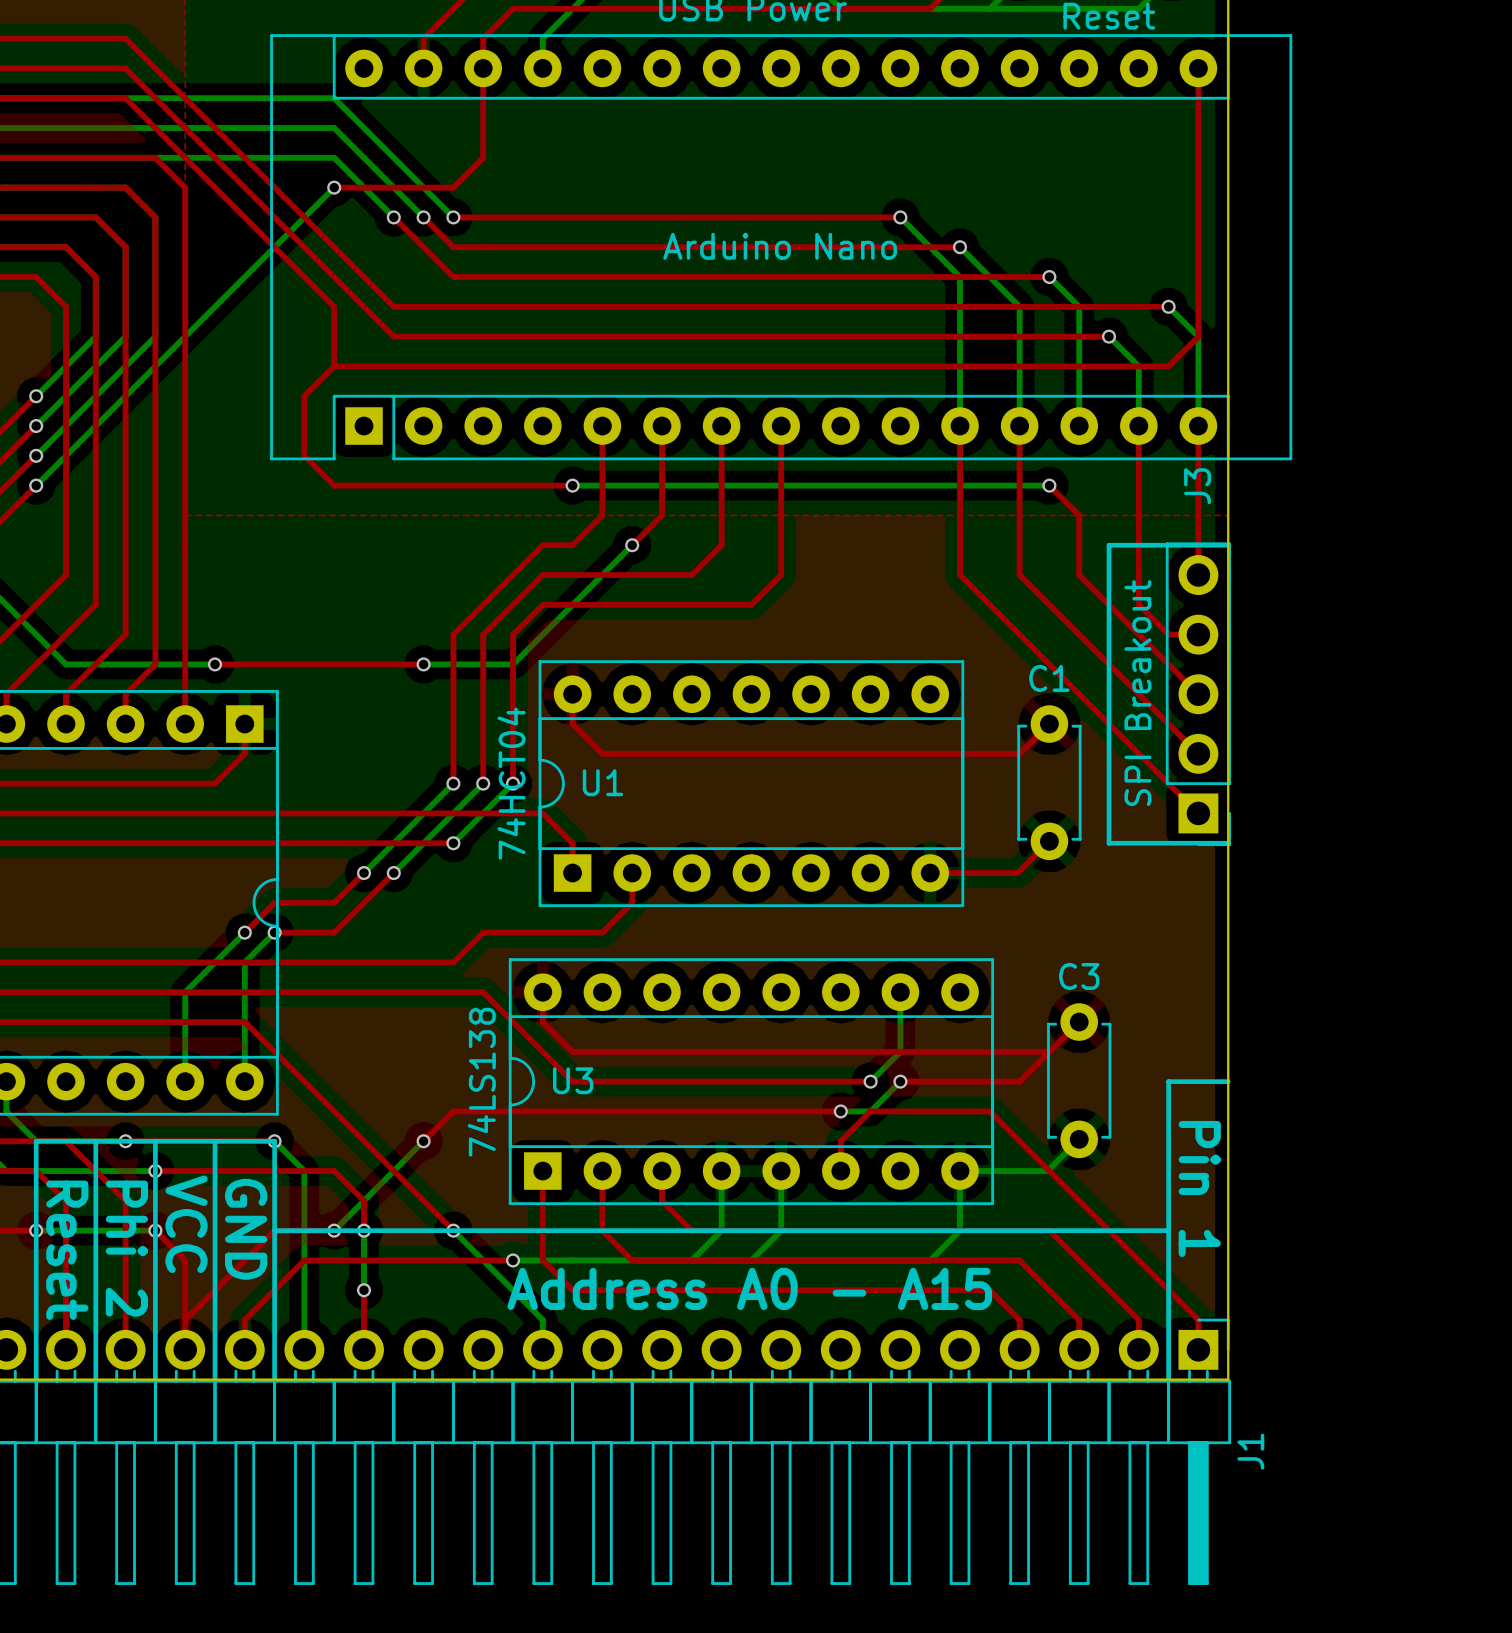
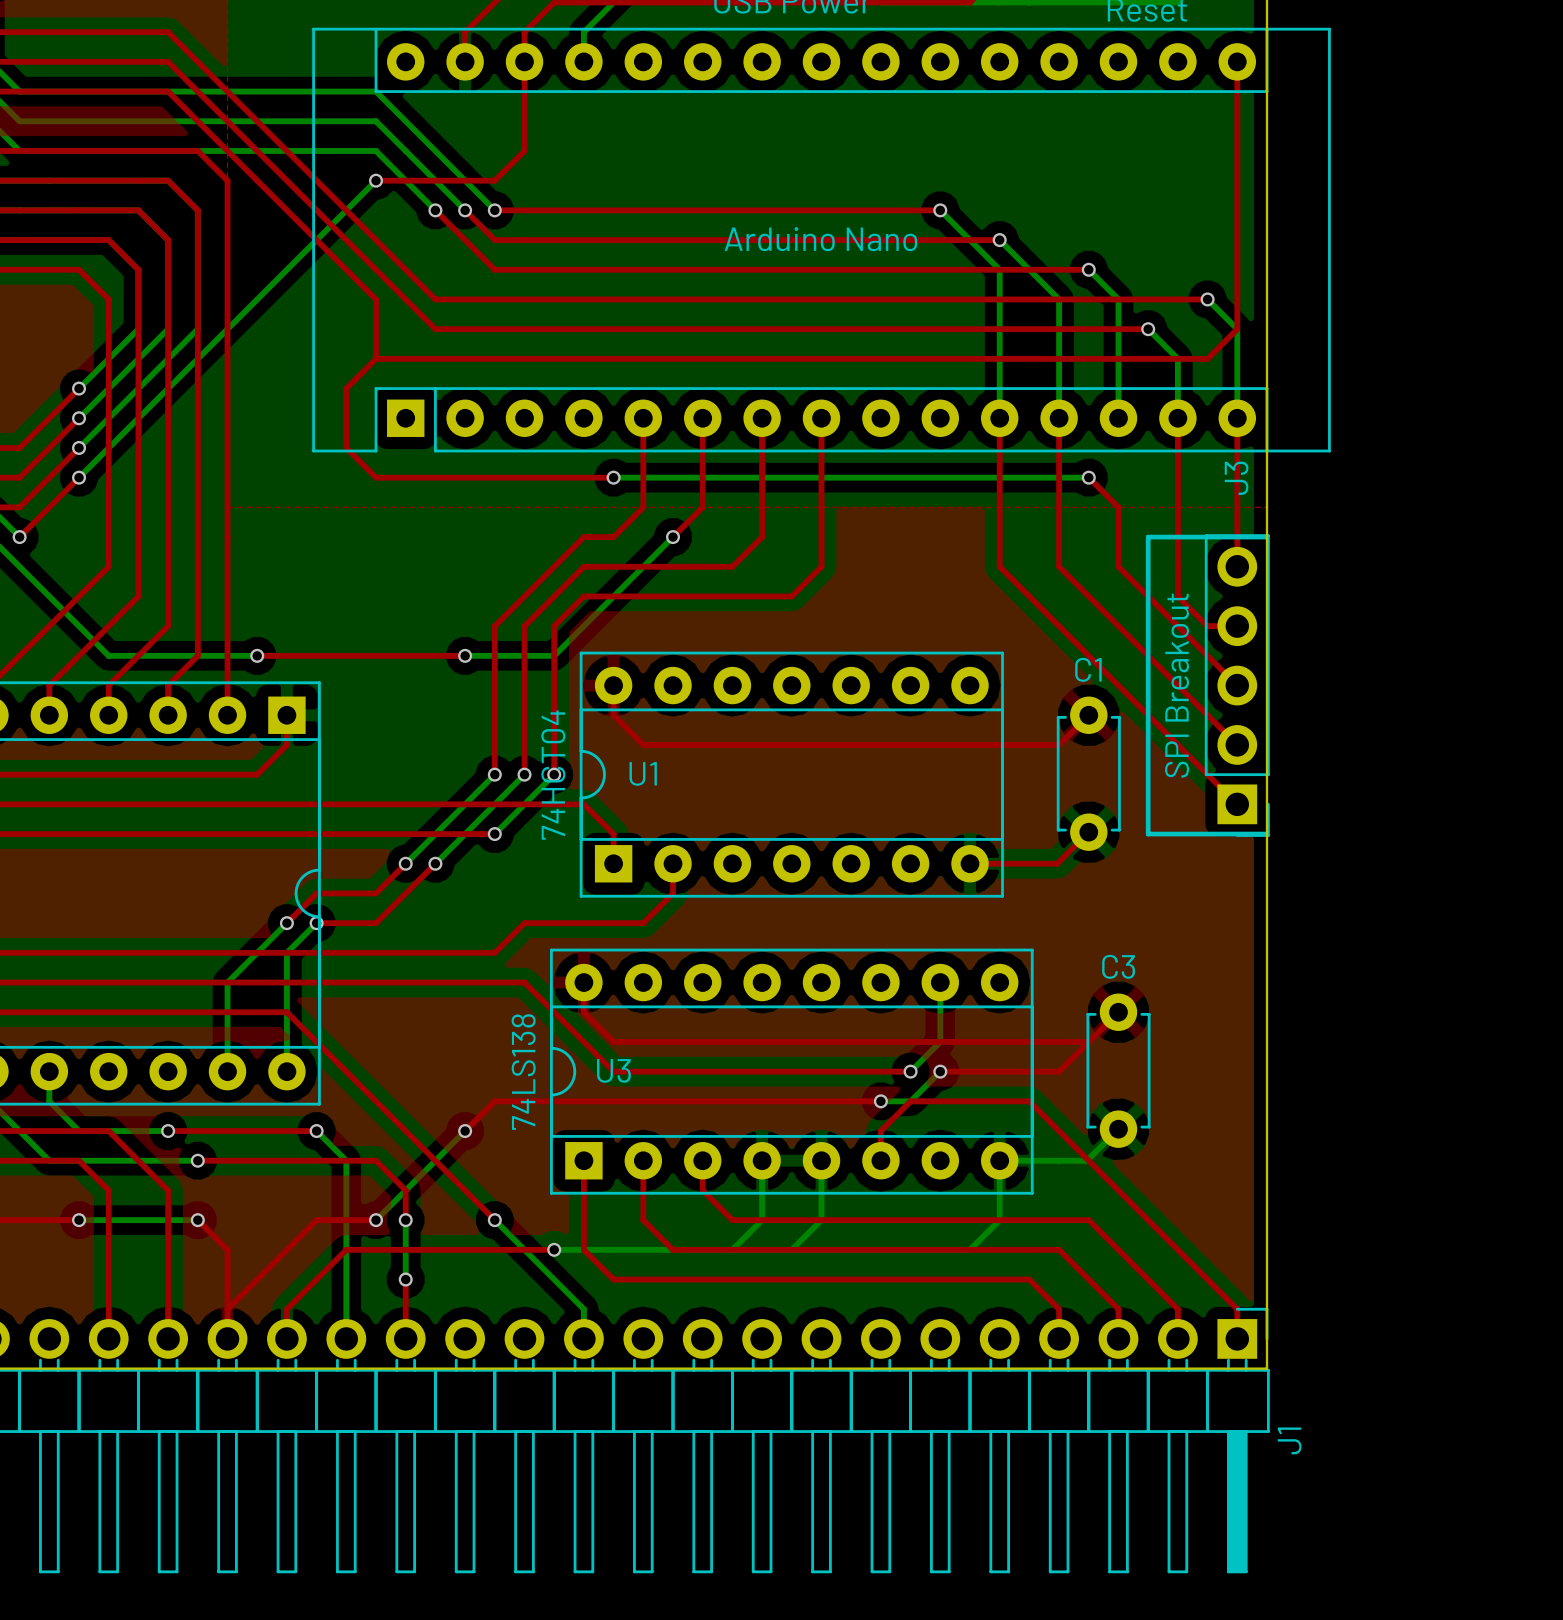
line: (1228, 1081) (1168, 1081) (1168, 1379) -> none
line: (95, 1141) (95, 1379) -> none
line: (155, 1141) (155, 1379) -> none
line: (215, 1141) (215, 1379) -> none
text: Pin 1 (1199, 1188) -> none
text: VCC (186, 1224) -> none
text: GND (246, 1229) -> none
line: (274, 1230) (1168, 1230) -> none
text: Phi 2 (126, 1248) -> none
text: Reset (67, 1250) -> none
text: Address A0 - A15 (749, 1288) -> none
line: (36, 1379) (36, 1141) (274, 1141) (274, 1379) -> none

